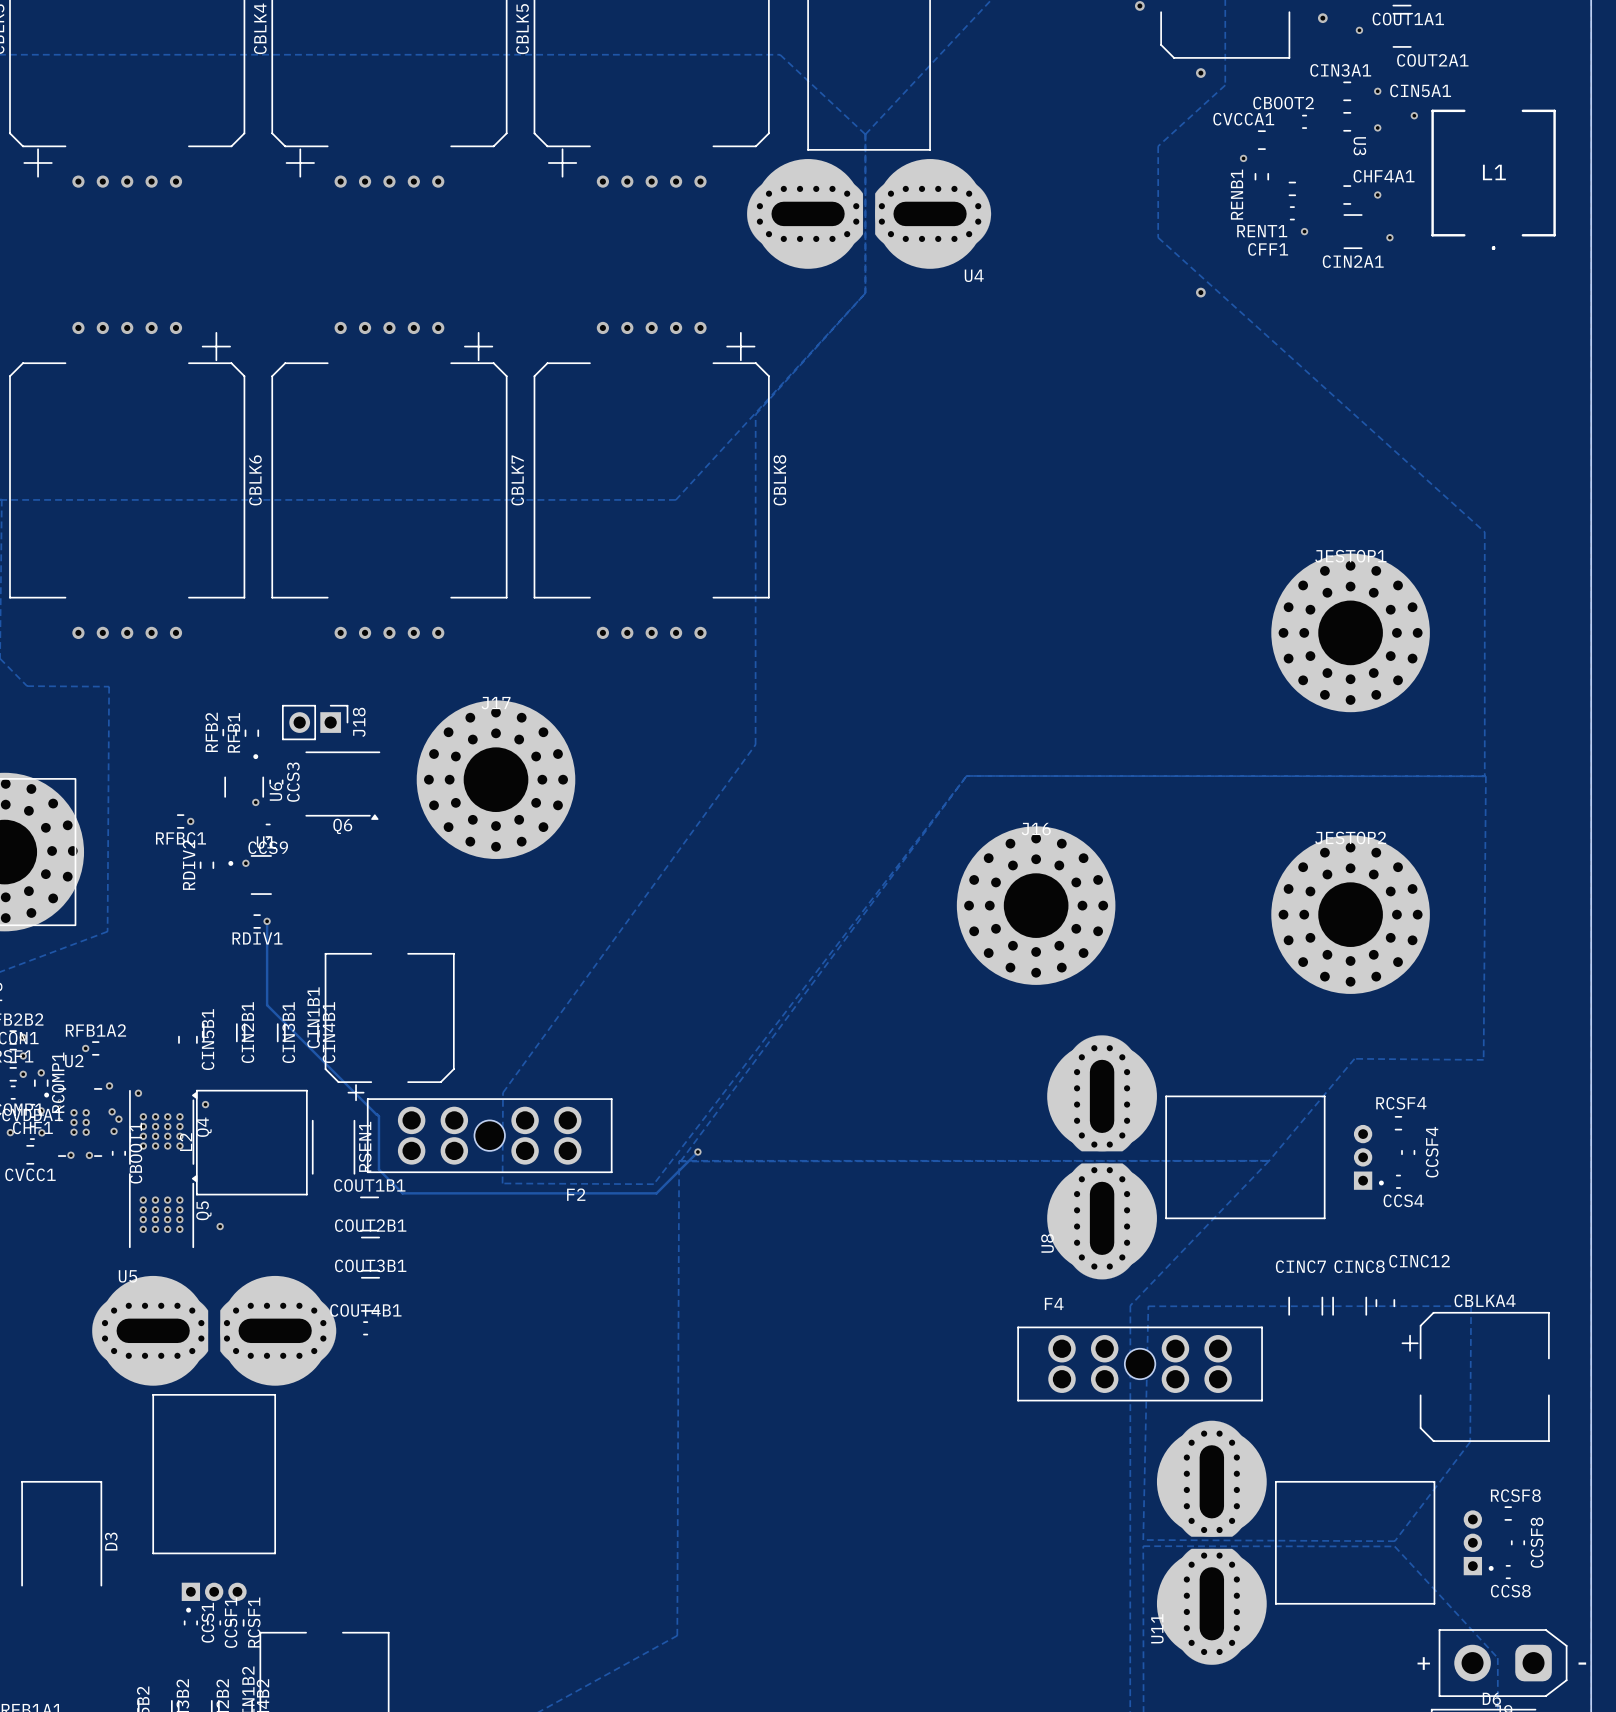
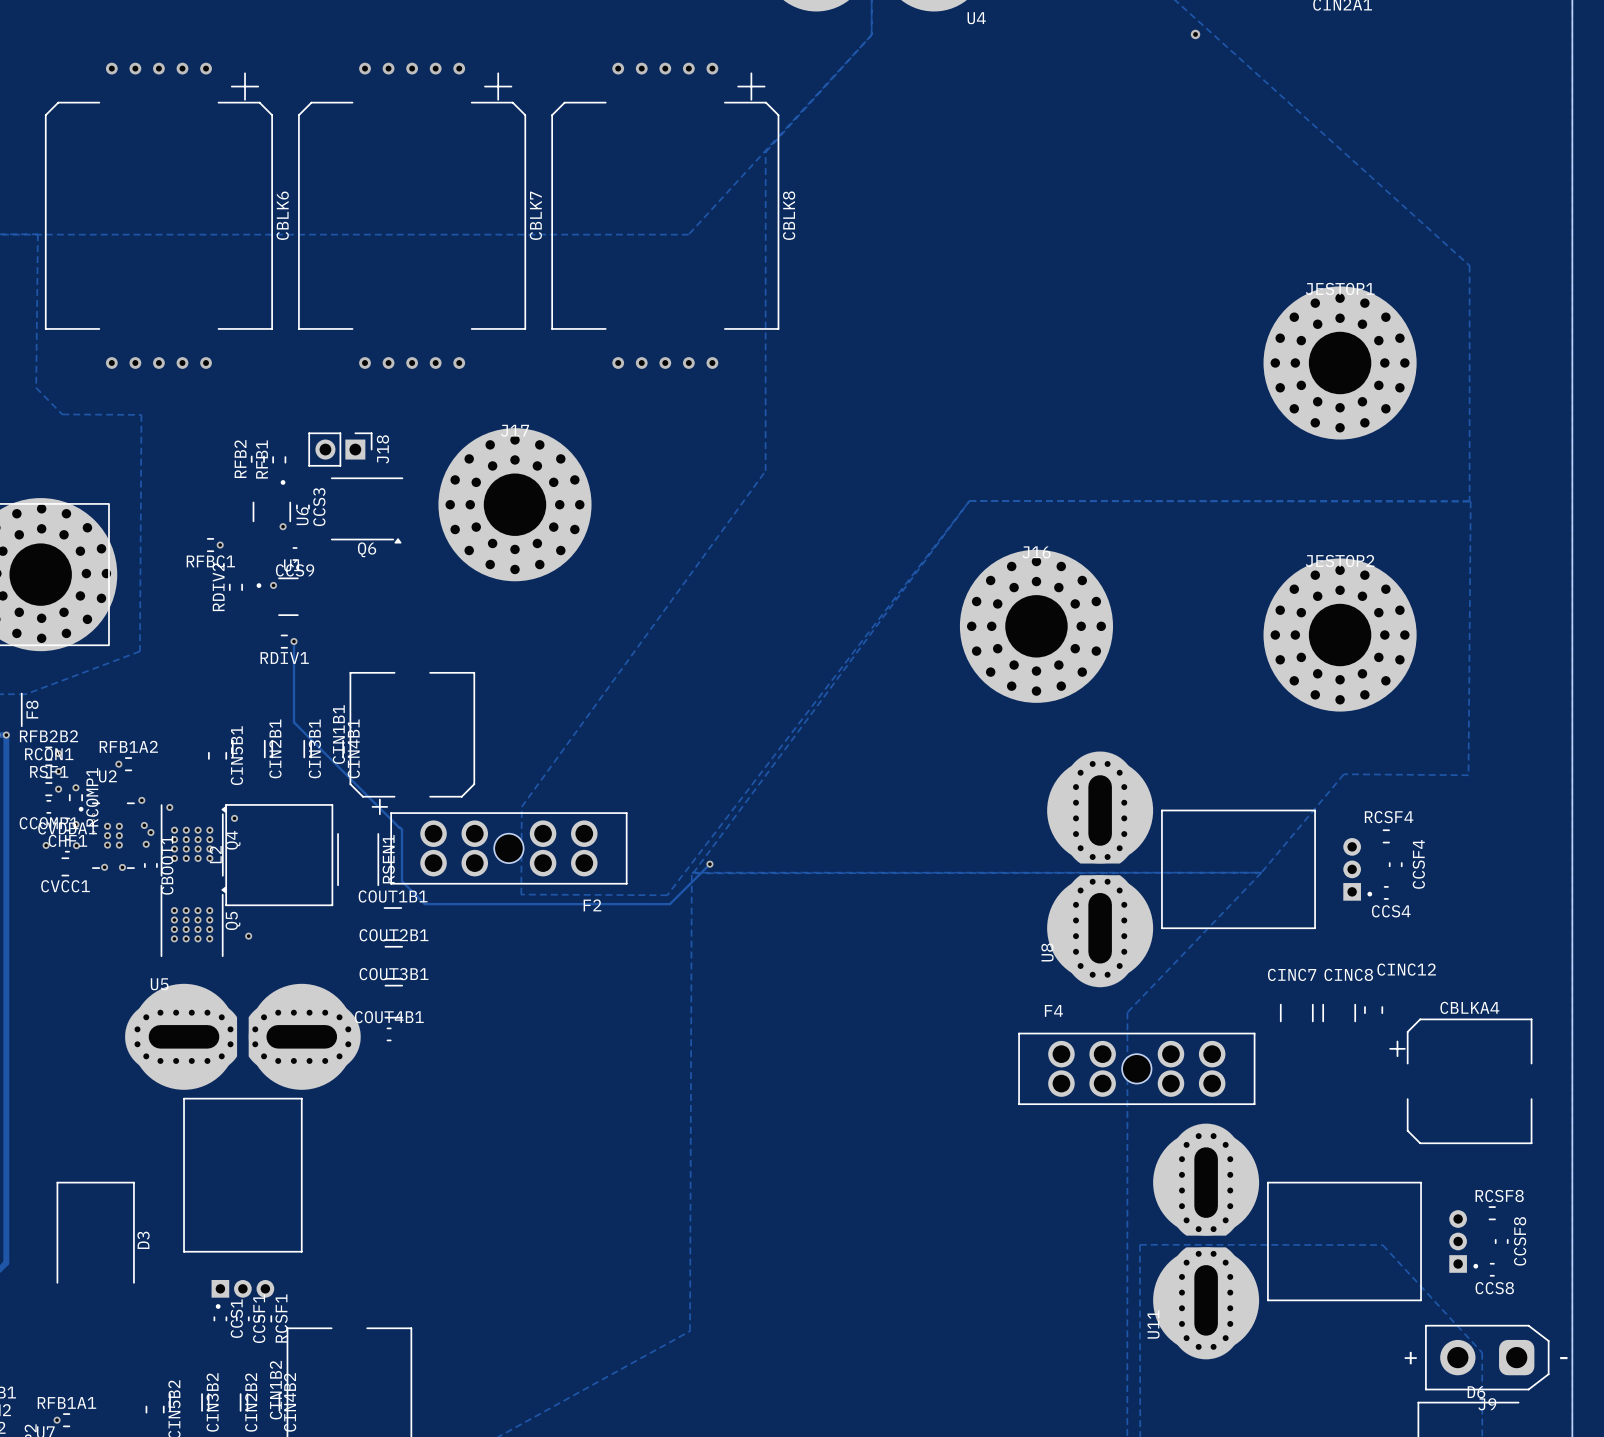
zone outline: (1471, 1306) (1148, 1306) (1143, 1539) (1394, 1541) (1470, 1441) (1471, 1306) -> none

